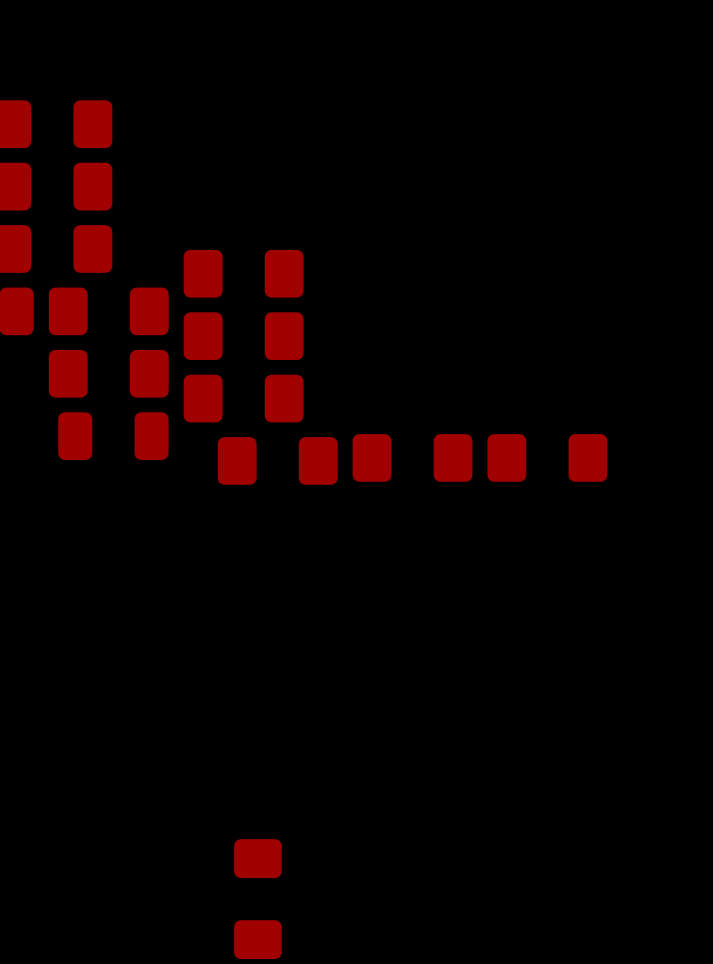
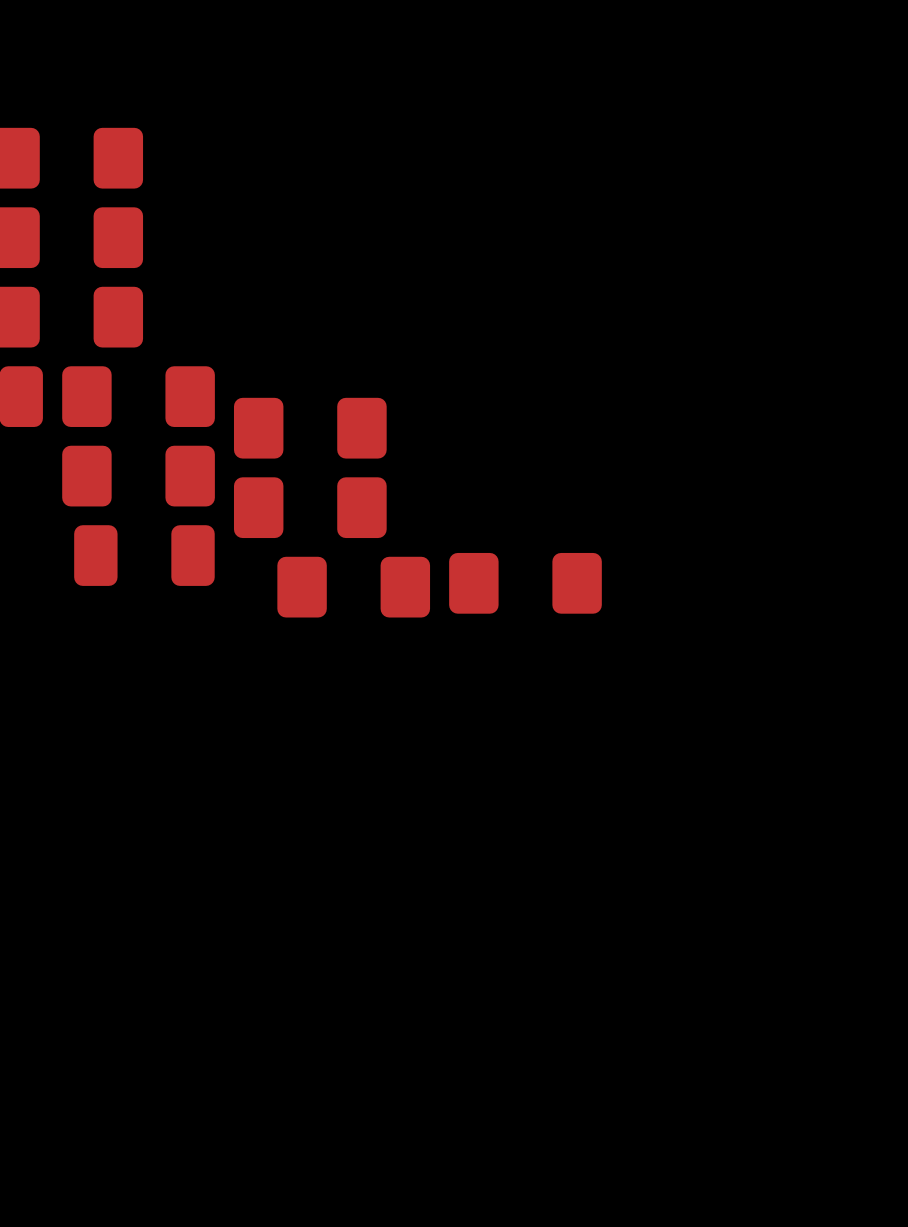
part: (243, 273) -> none
part: (547, 457) -> none
part: (257, 899) -> none

